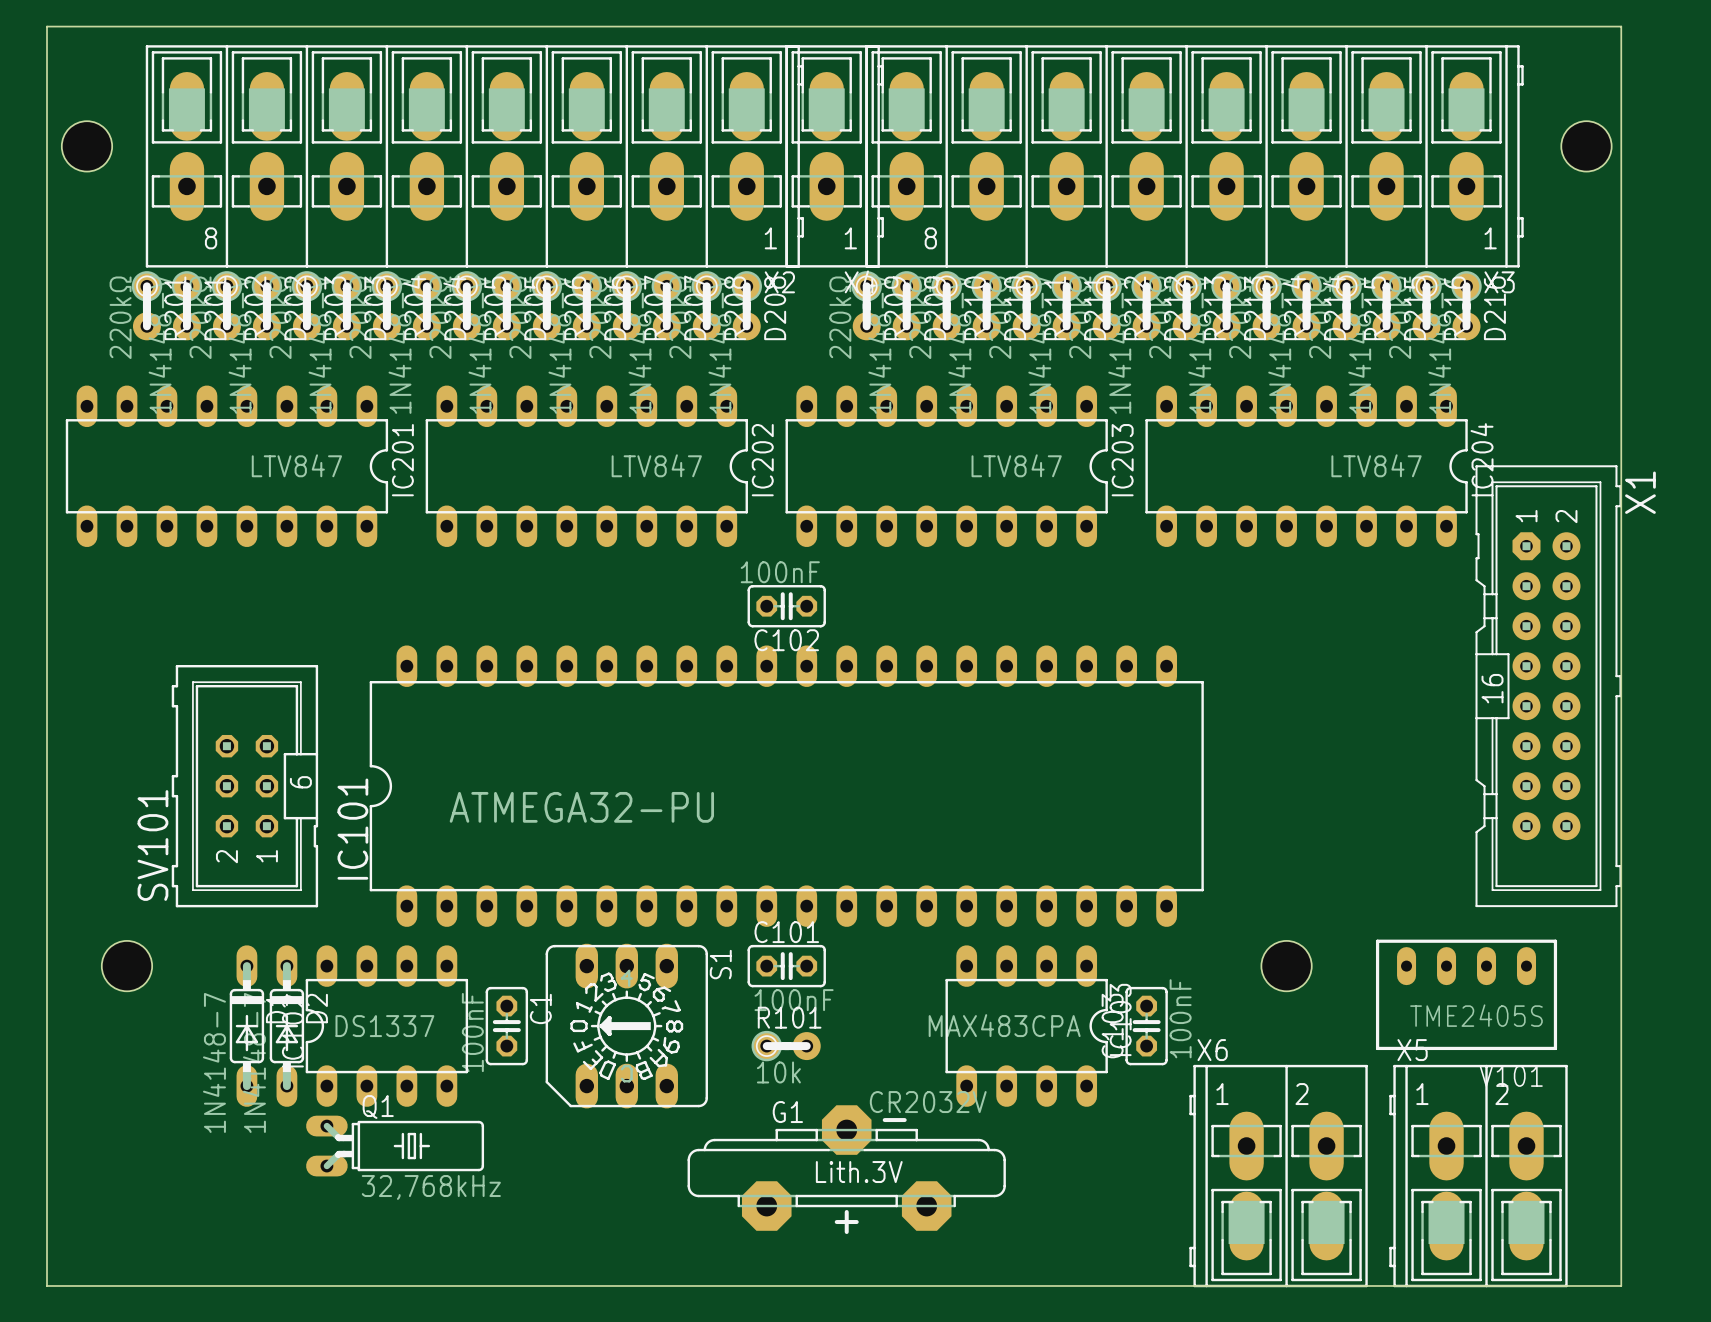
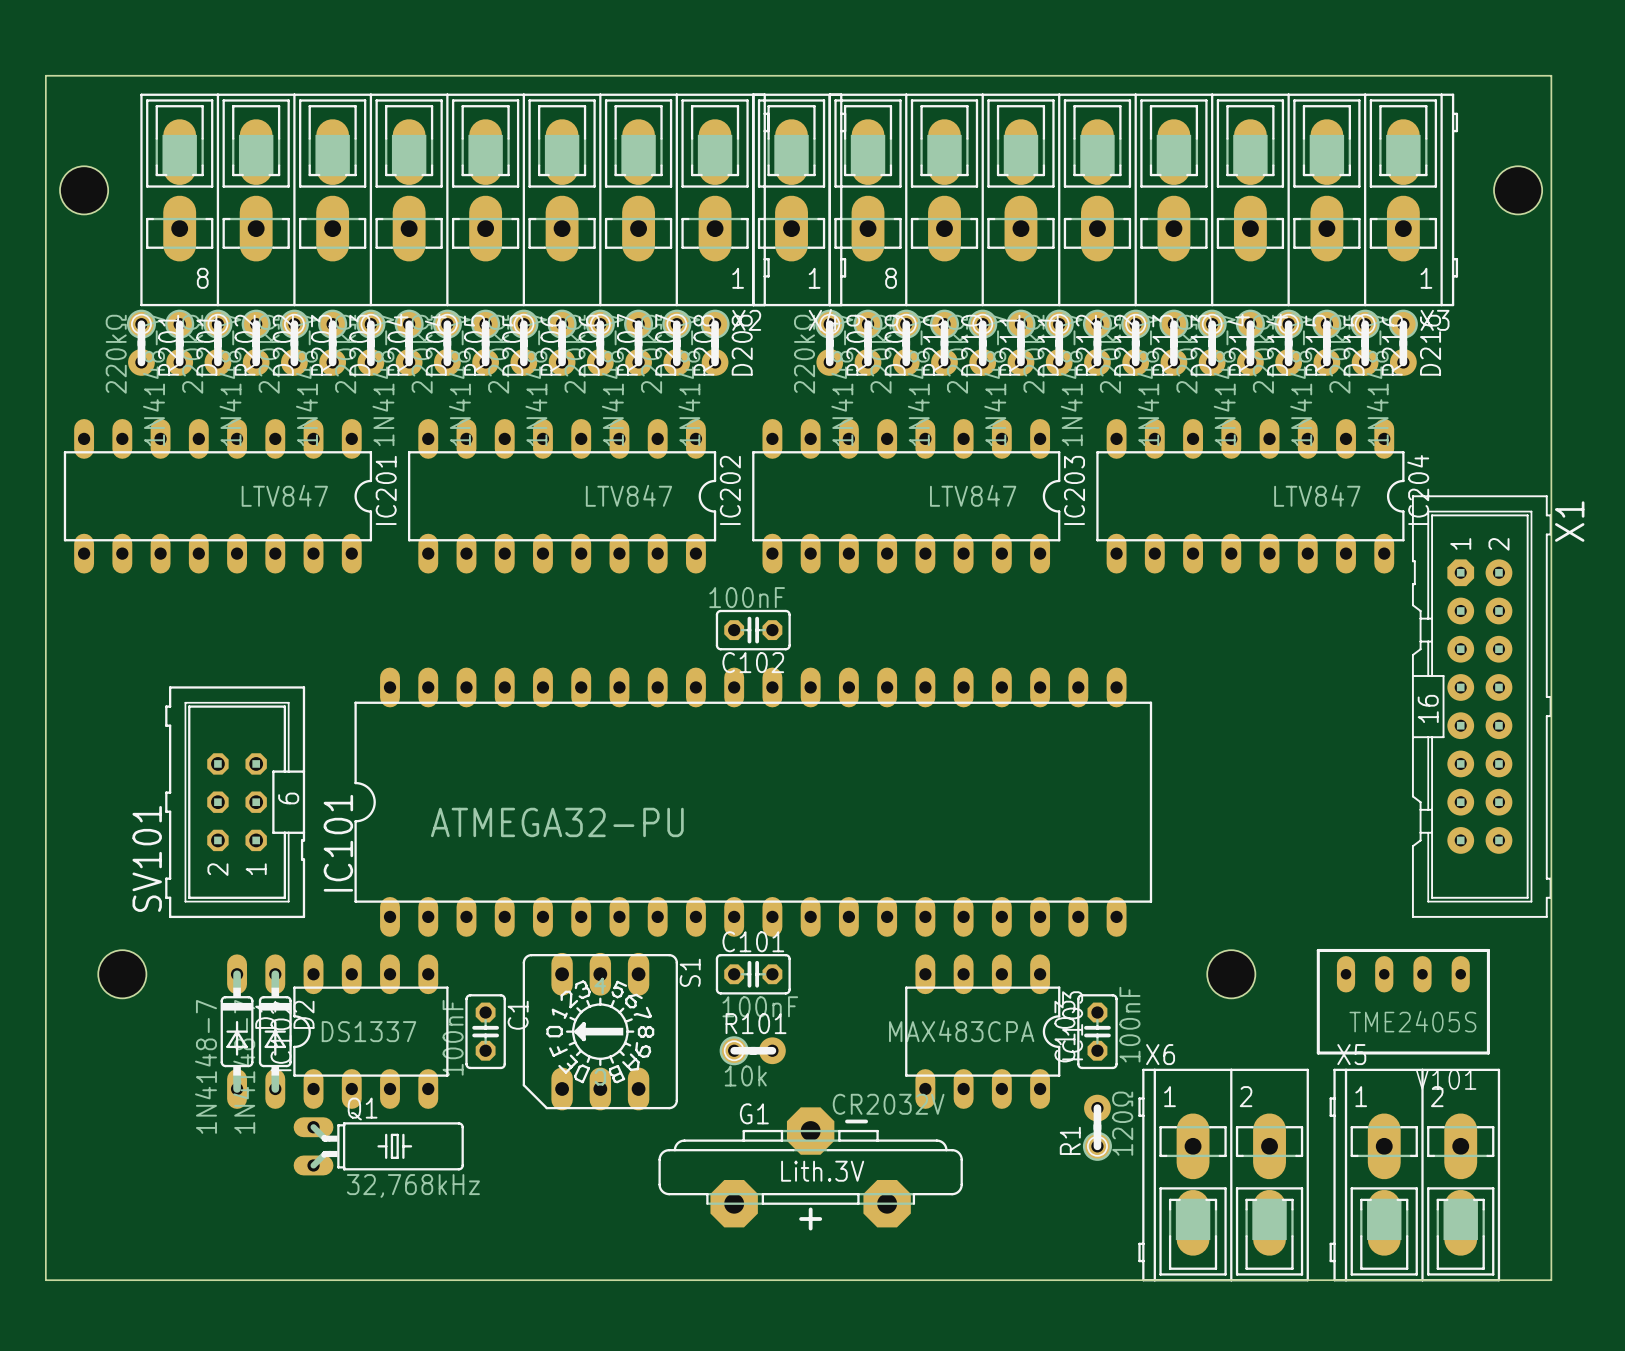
R1: none -> 120Ω (1097, 1127)

